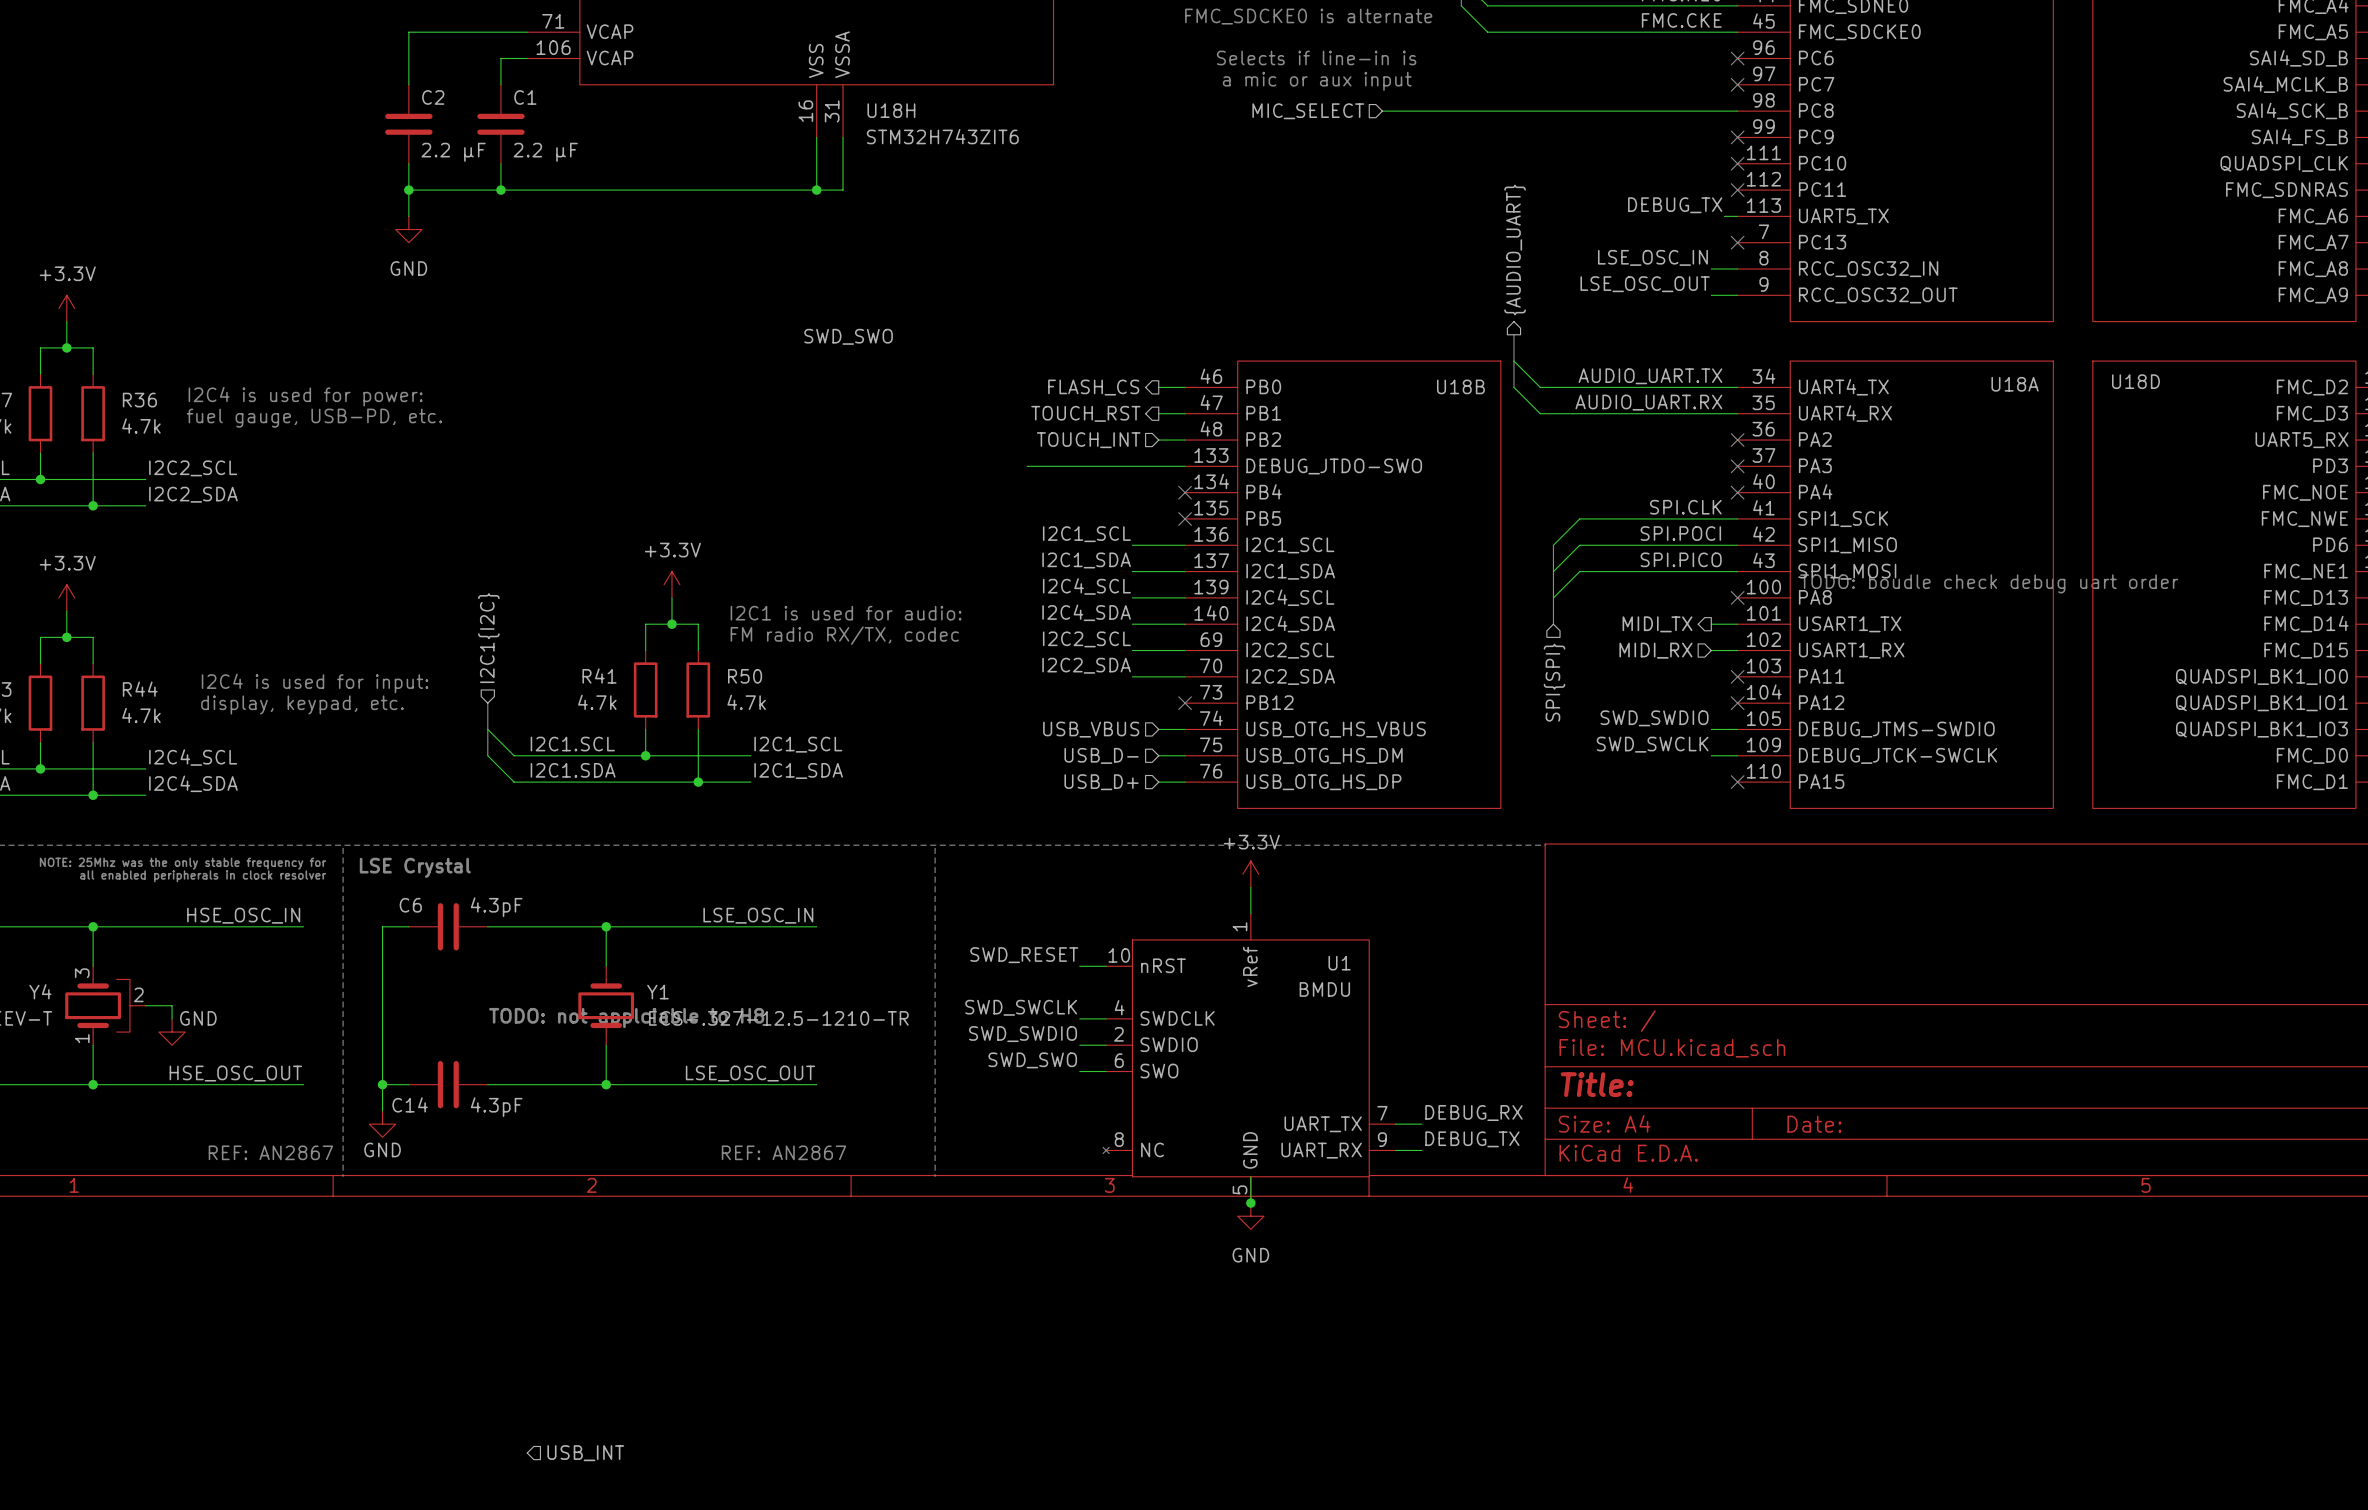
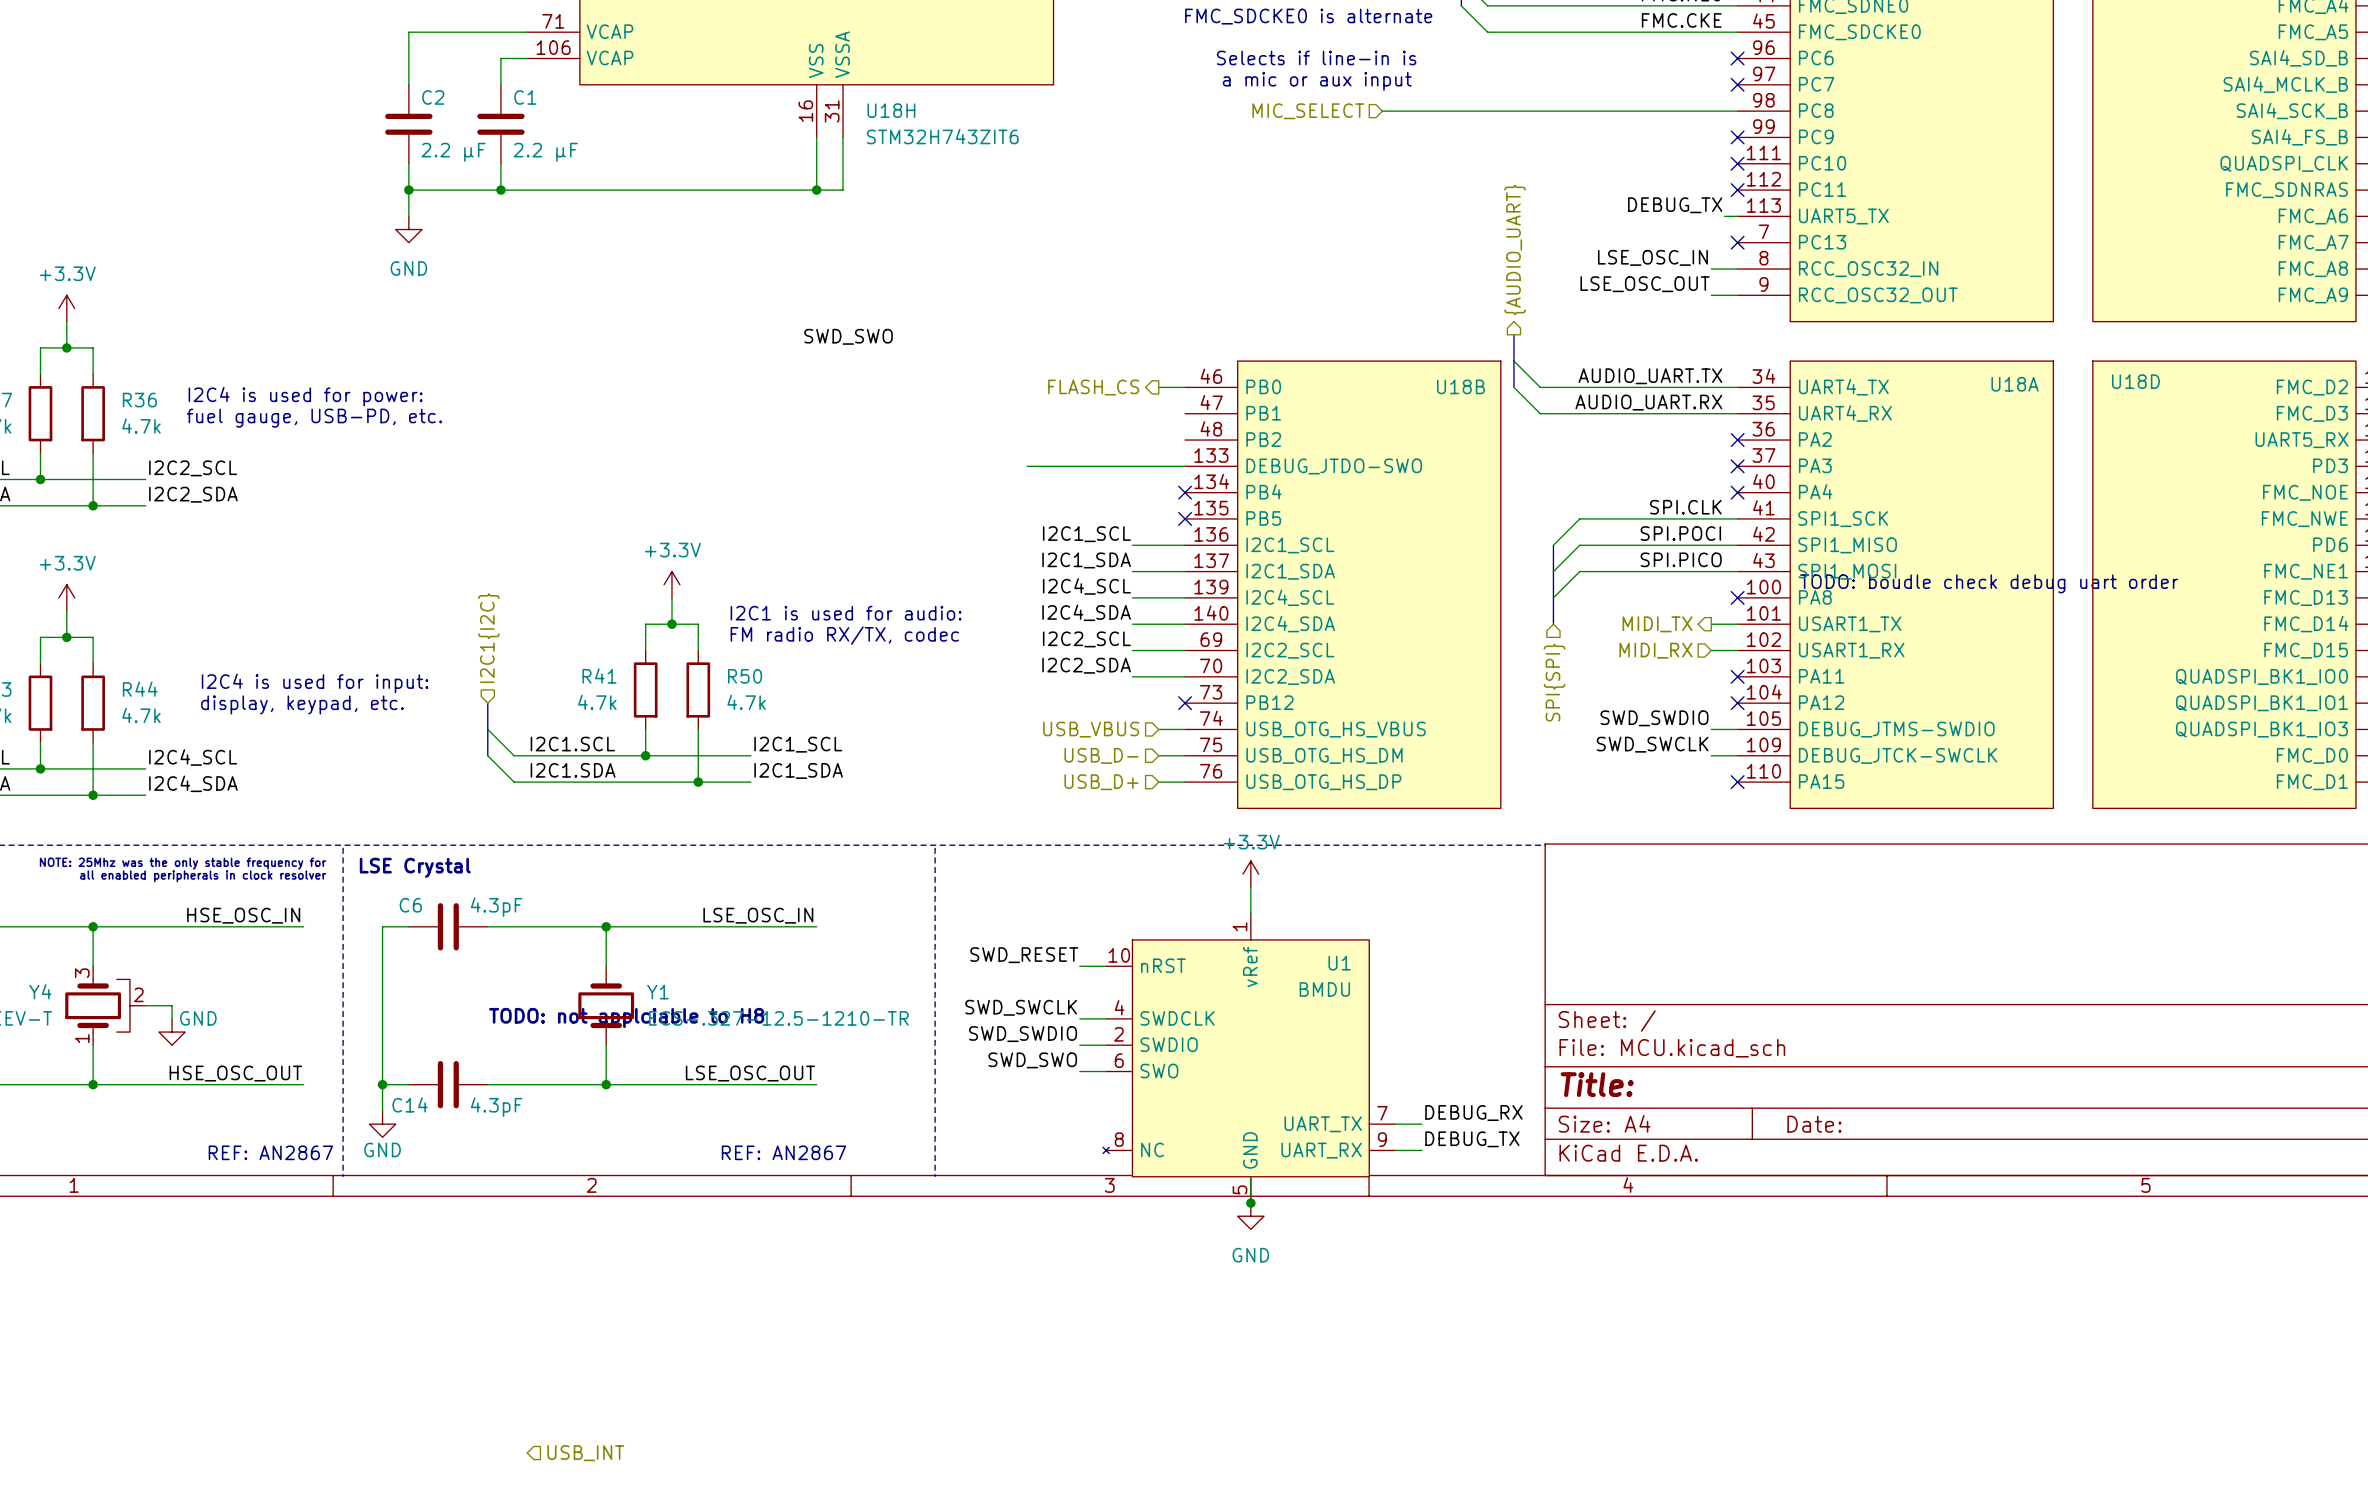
hierarchical label: TOUCH_RST (1085, 413) -> none
wire: (1158, 413) (1185, 413) -> none
hierarchical label: TOUCH_INT (1088, 440) -> none
wire: (1158, 440) (1185, 440) -> none

